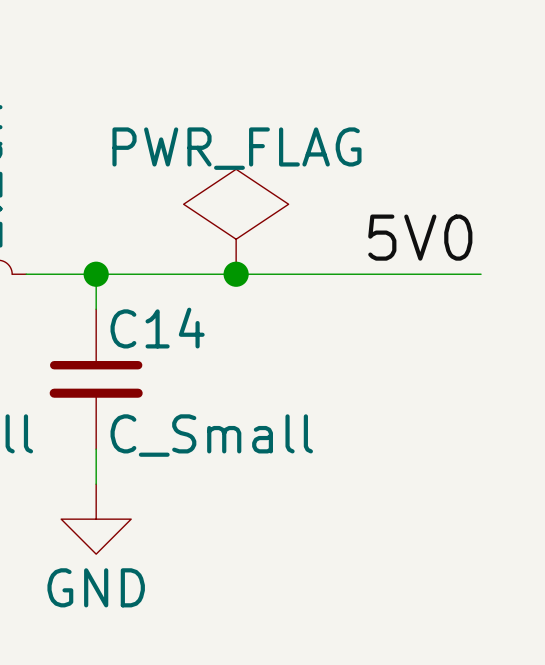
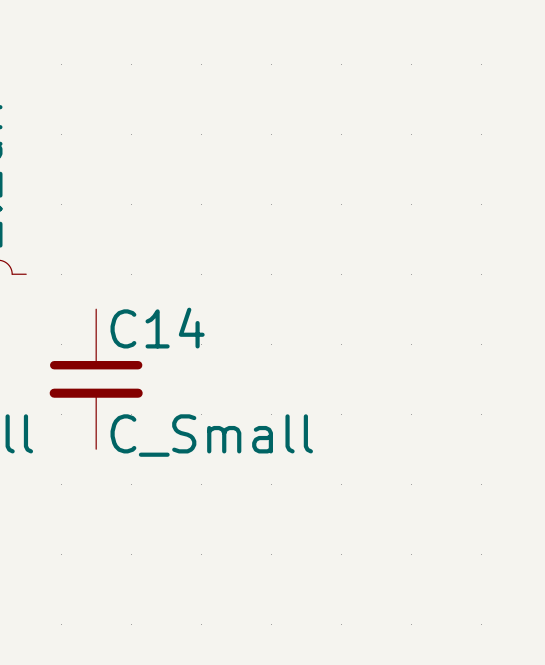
power symbol: PWR_FLAG (236, 221) -> none
label: 5V0 (420, 237) -> none
wire: (26, 274) (481, 274) -> none
wire: (96, 274) (96, 309) -> none
junction: (96, 274) -> none
junction: (236, 274) -> none
wire: (96, 449) (96, 484) -> none
power symbol: GND (96, 519) -> none

